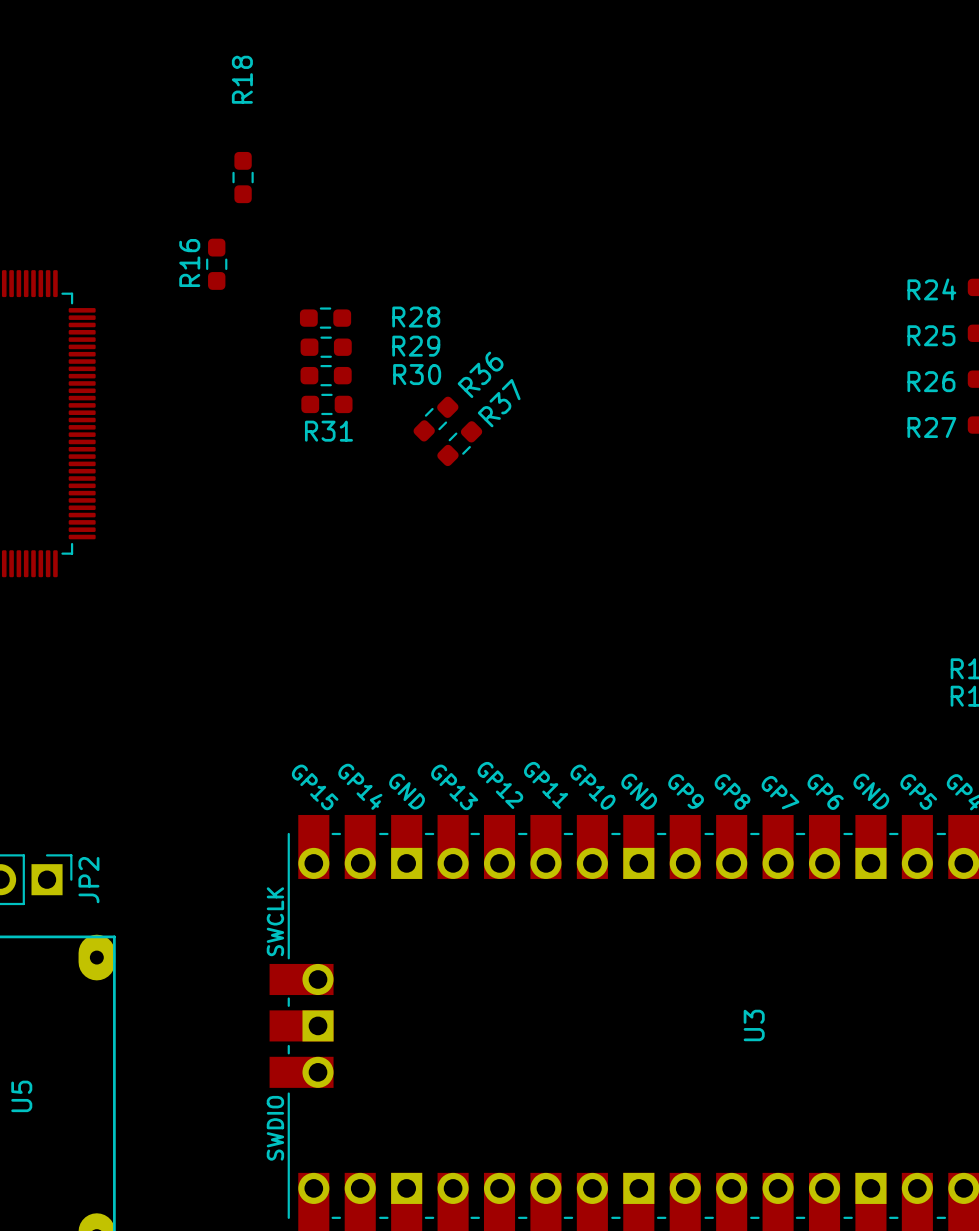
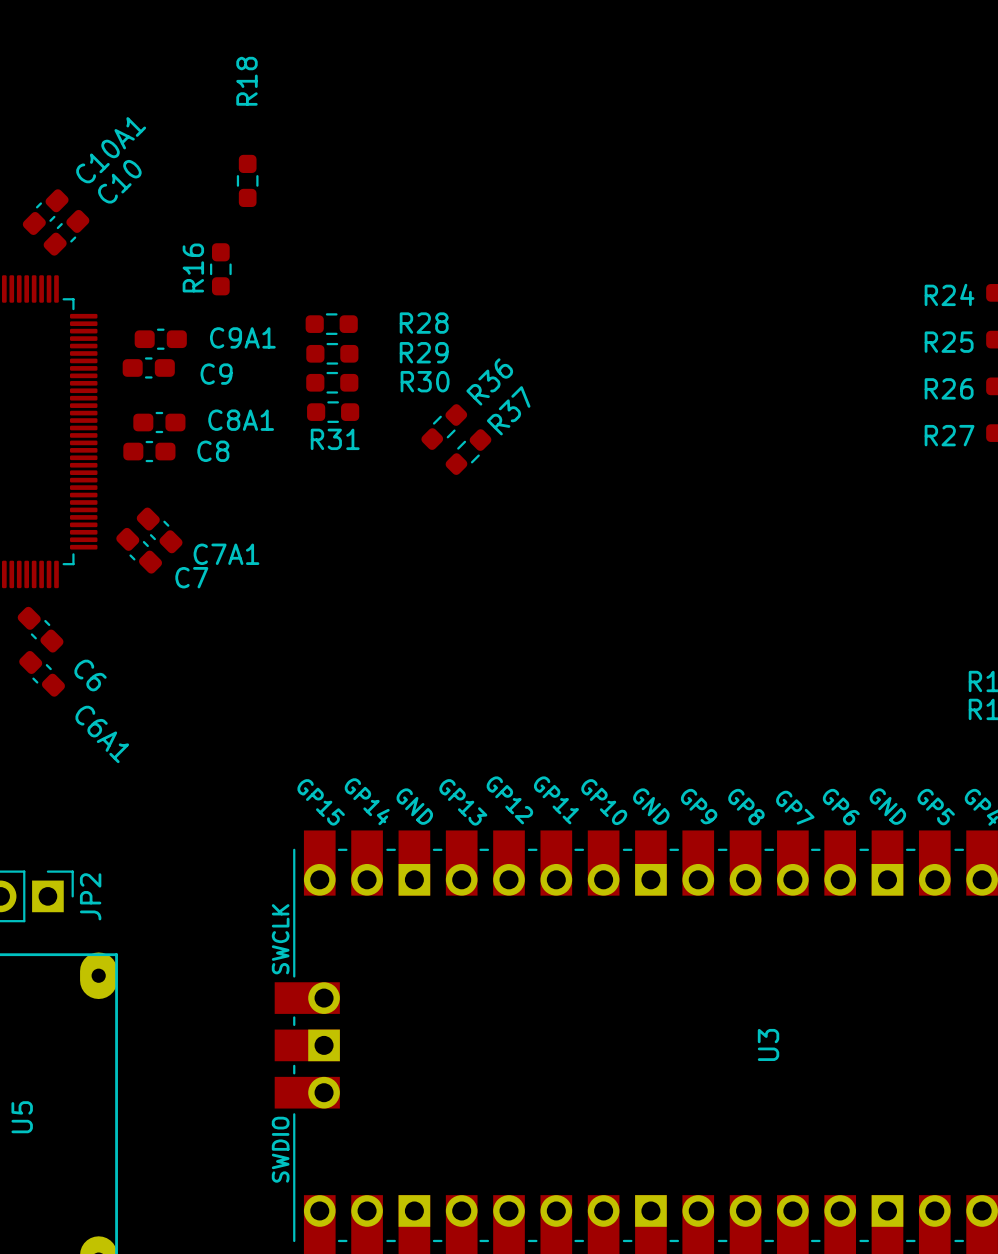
C10A1: none -> (45, 212)
C10: none -> (66, 232)
C9A1: none -> (160, 339)
C9: none -> (148, 367)
C8A1: none -> (159, 422)
C8: none -> (149, 451)
C7A1: none -> (159, 530)
C7: none -> (139, 550)
C6: none -> (40, 629)
C6A1: none -> (42, 673)

